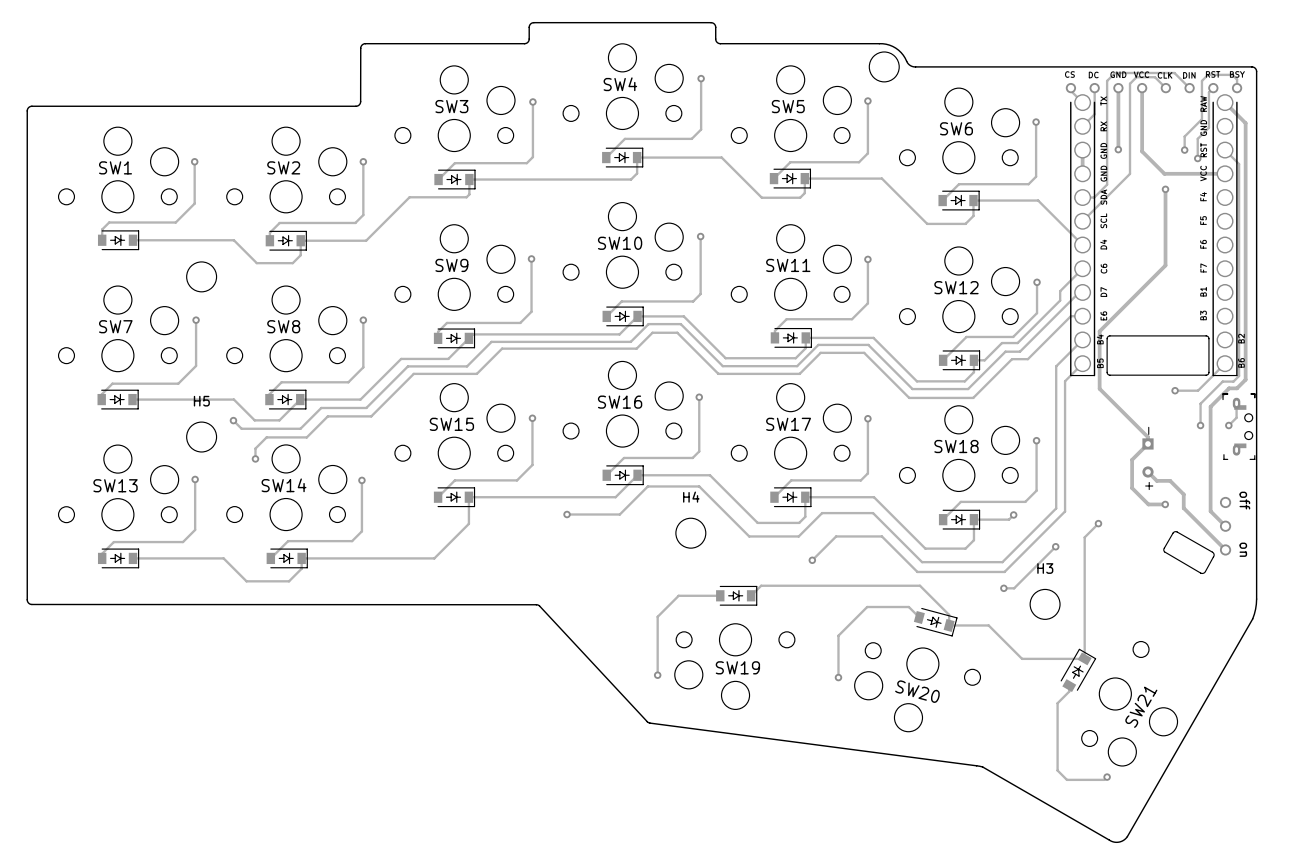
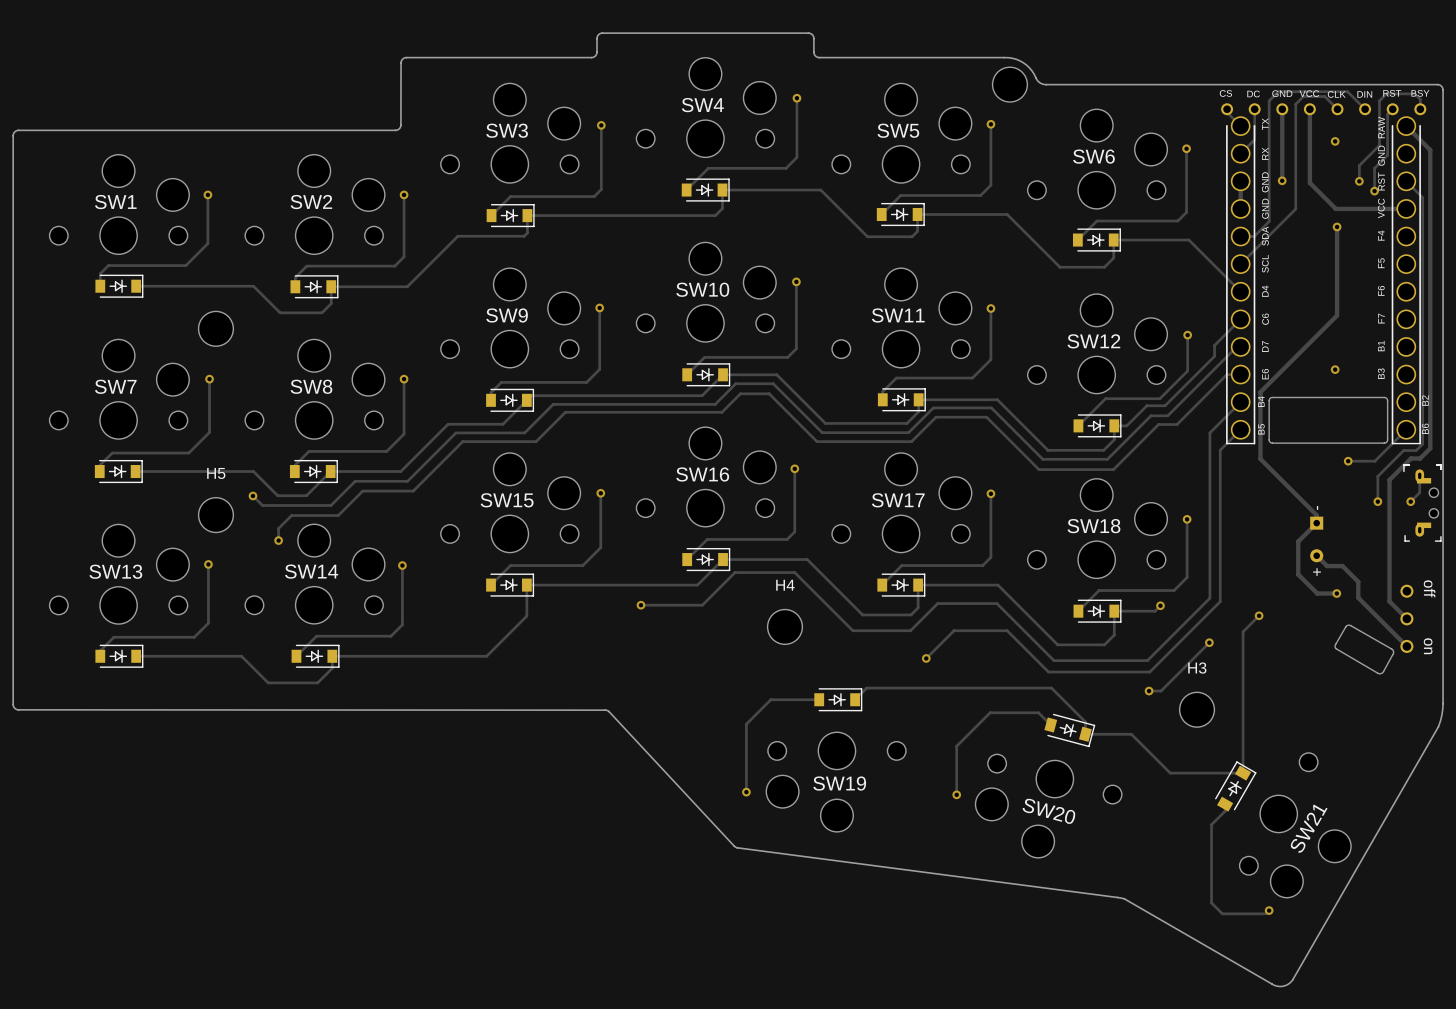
via: none -> (1335, 141)
via: none -> (1335, 369)

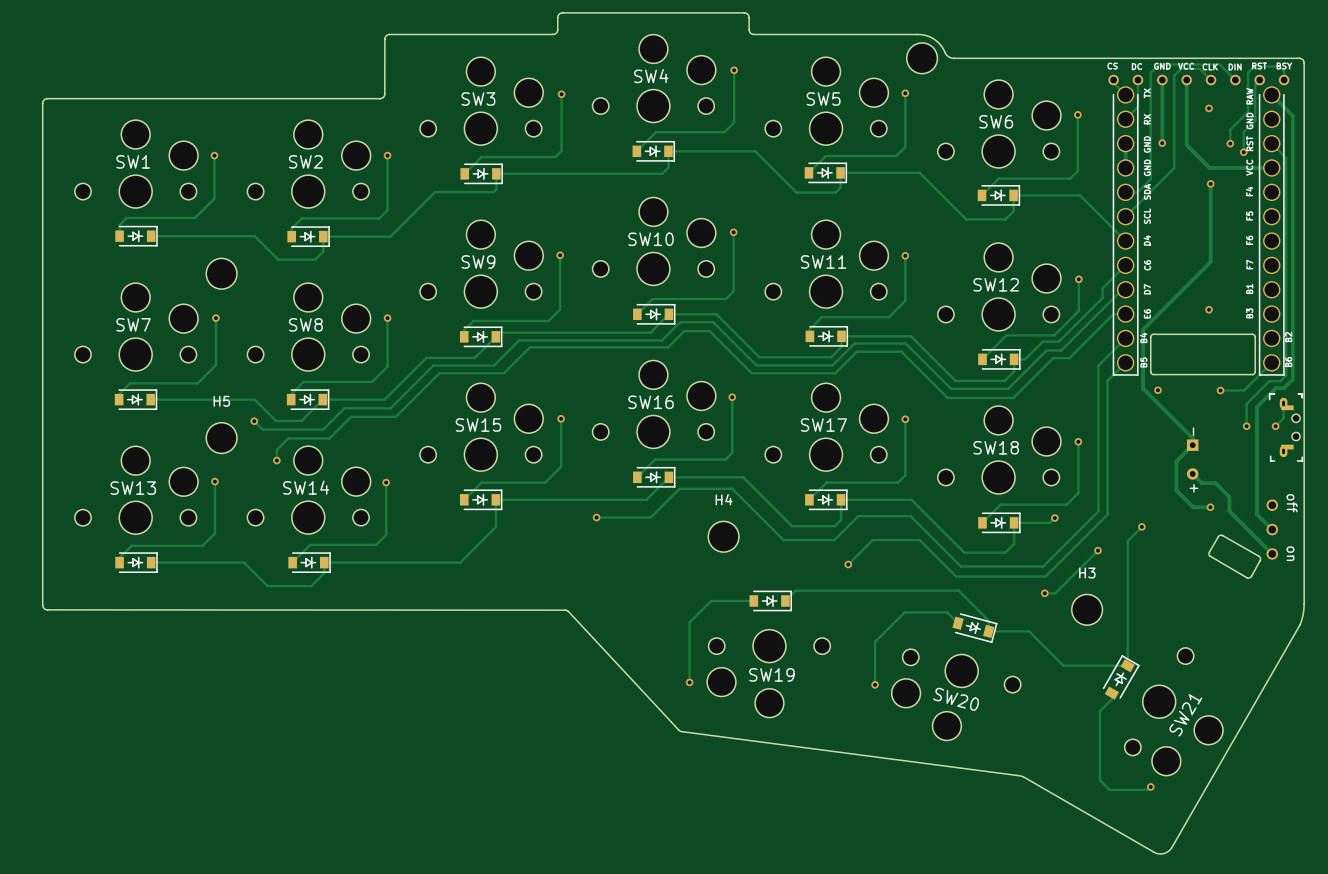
via: none -> (1157, 390)

